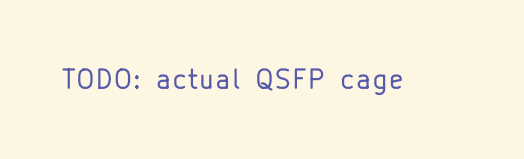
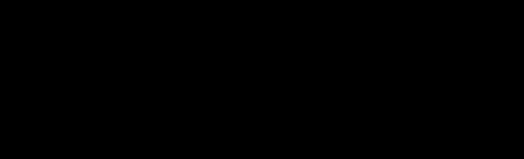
text: TODO: actual QSFP cage (232, 81) -> none

